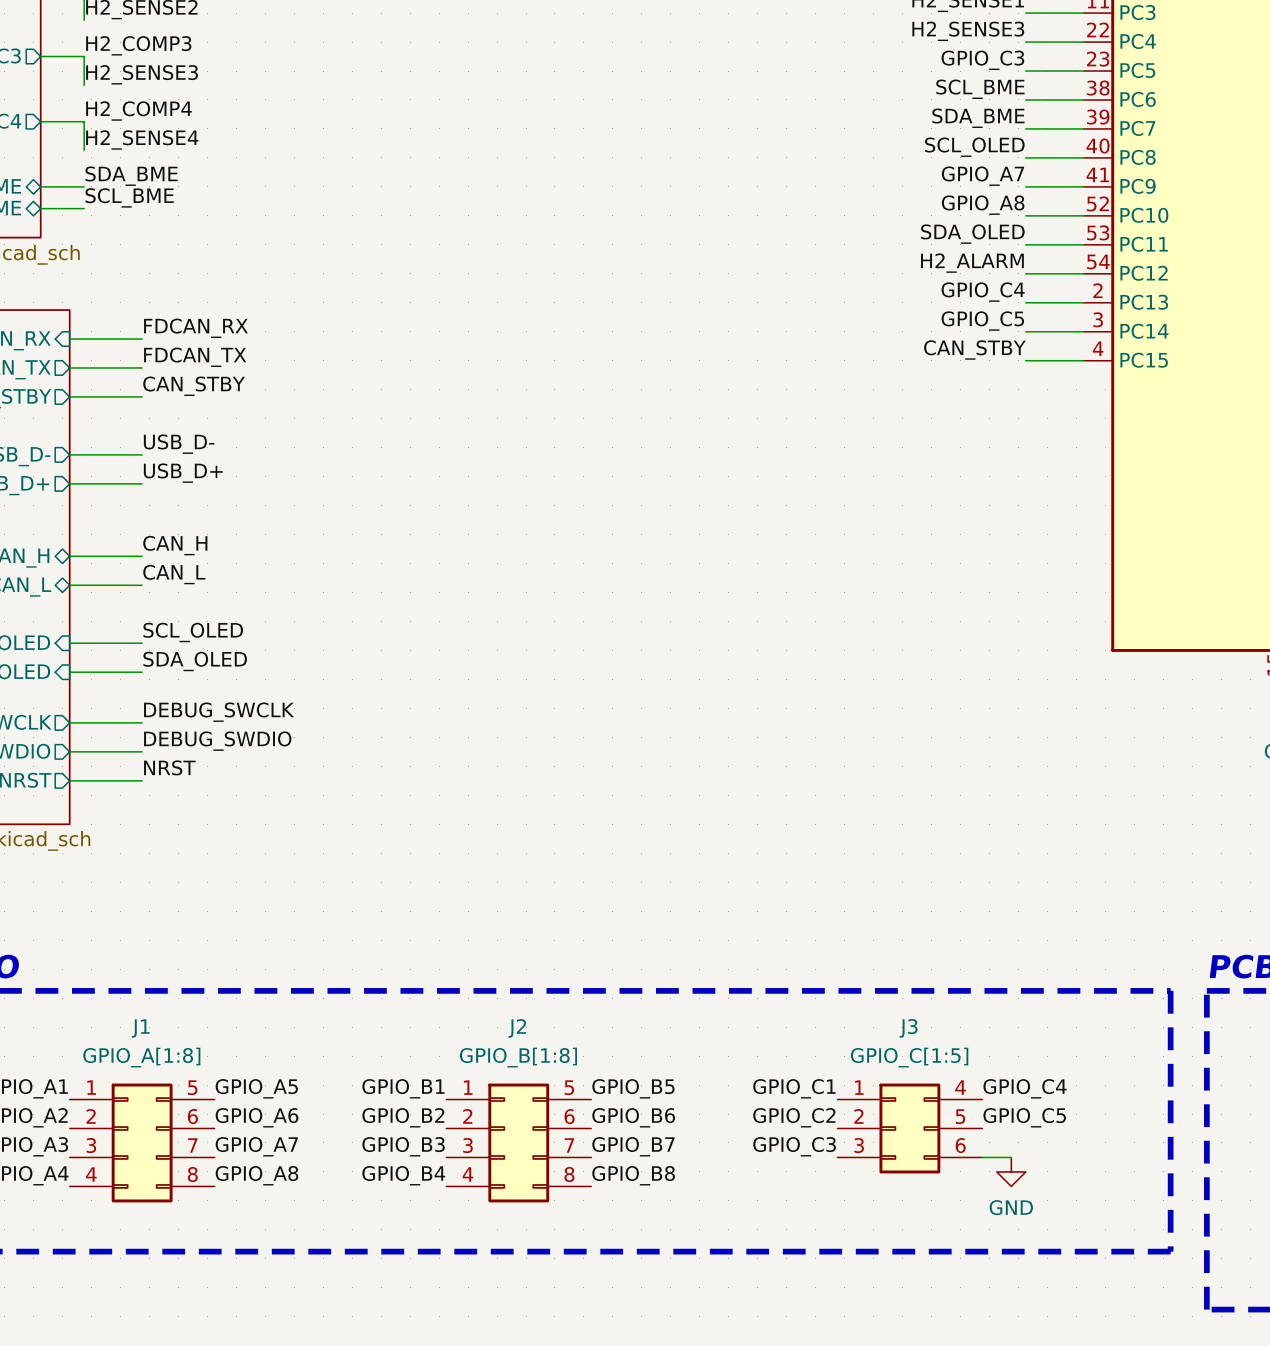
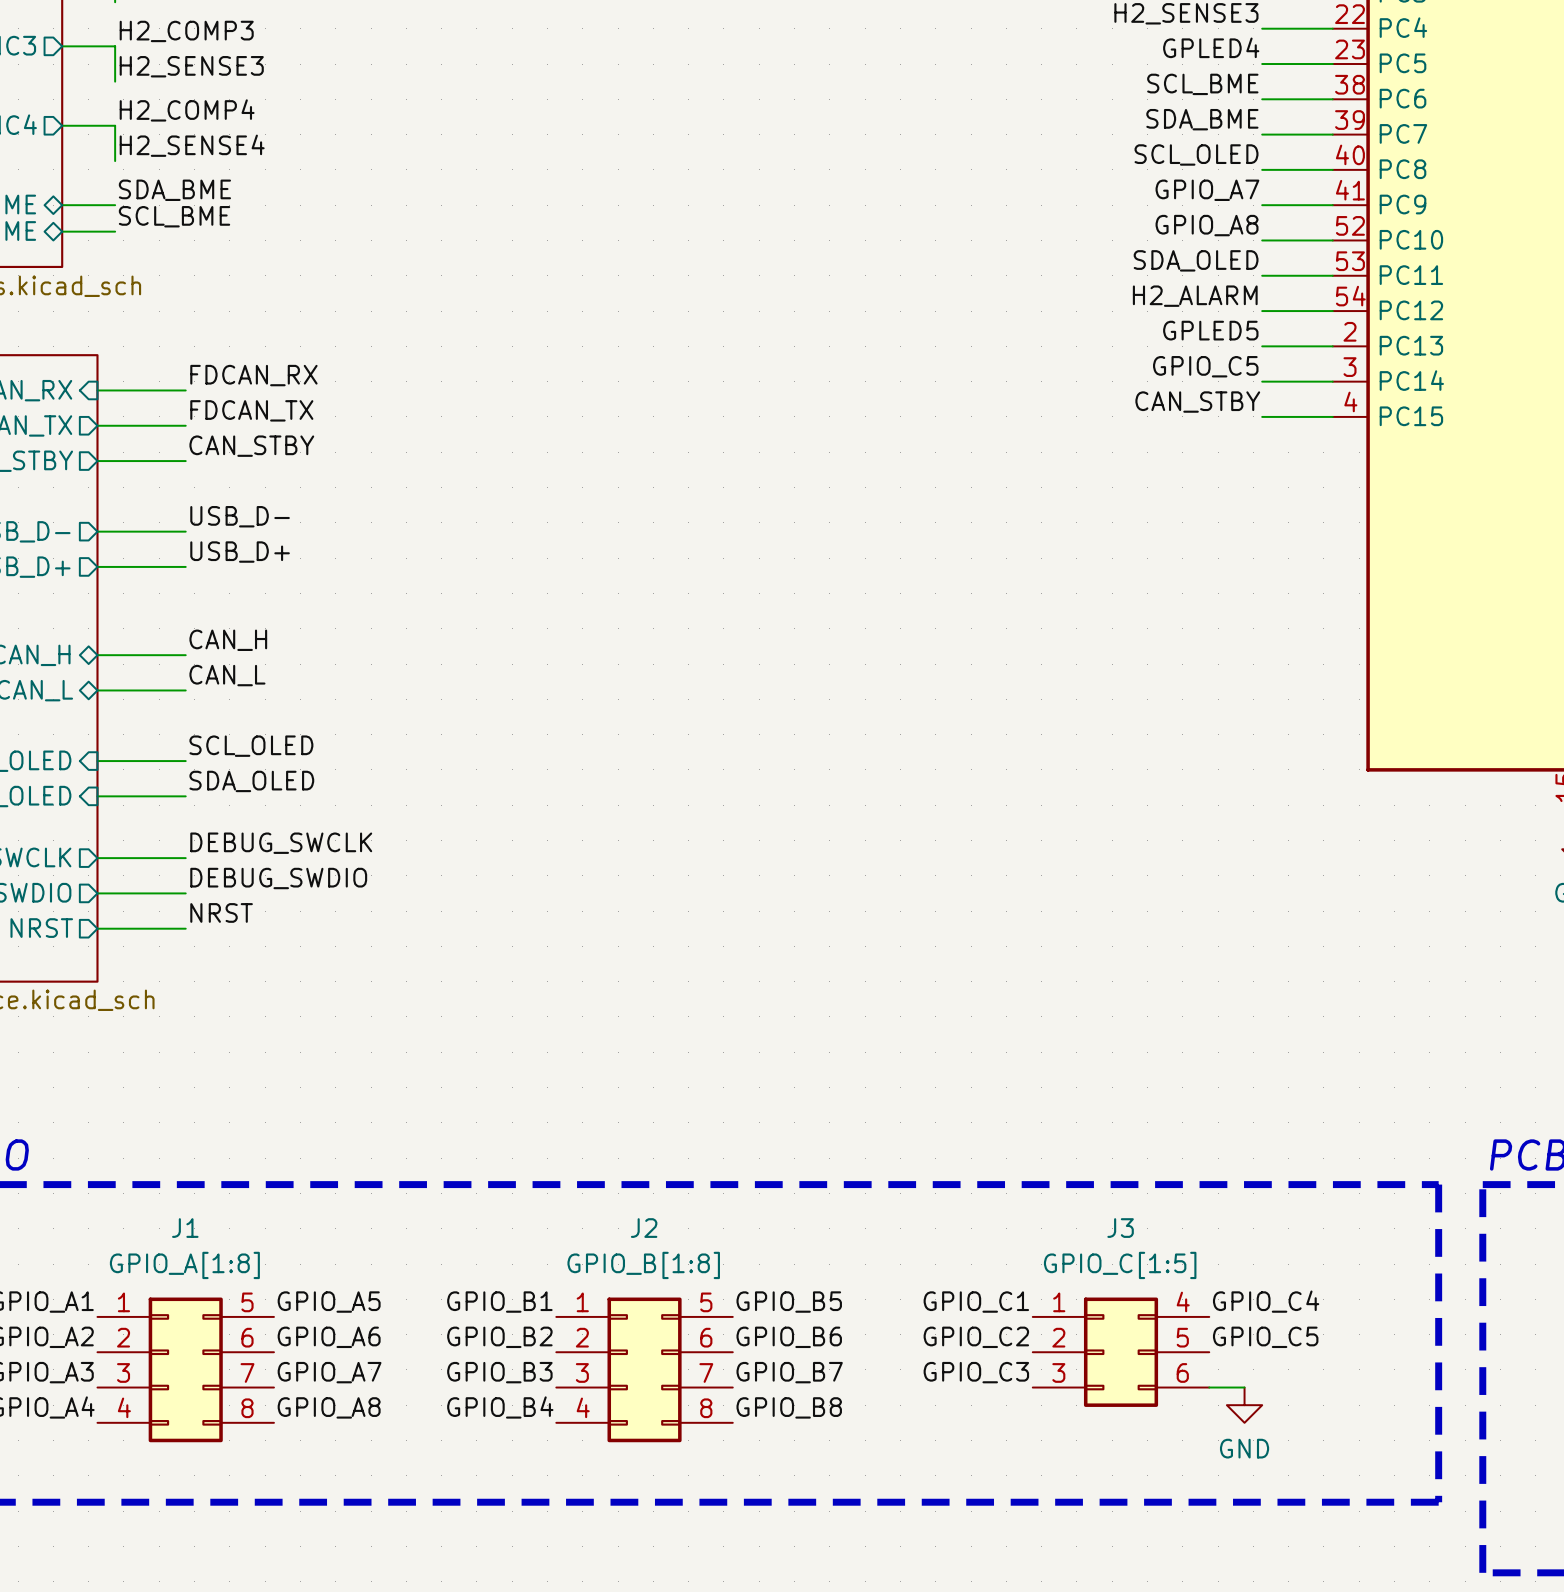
label: GPIO_C3 (982, 60) -> GPLED4 (1211, 47)
label: GPIO_C4 (983, 292) -> GPLED5 (1210, 330)

